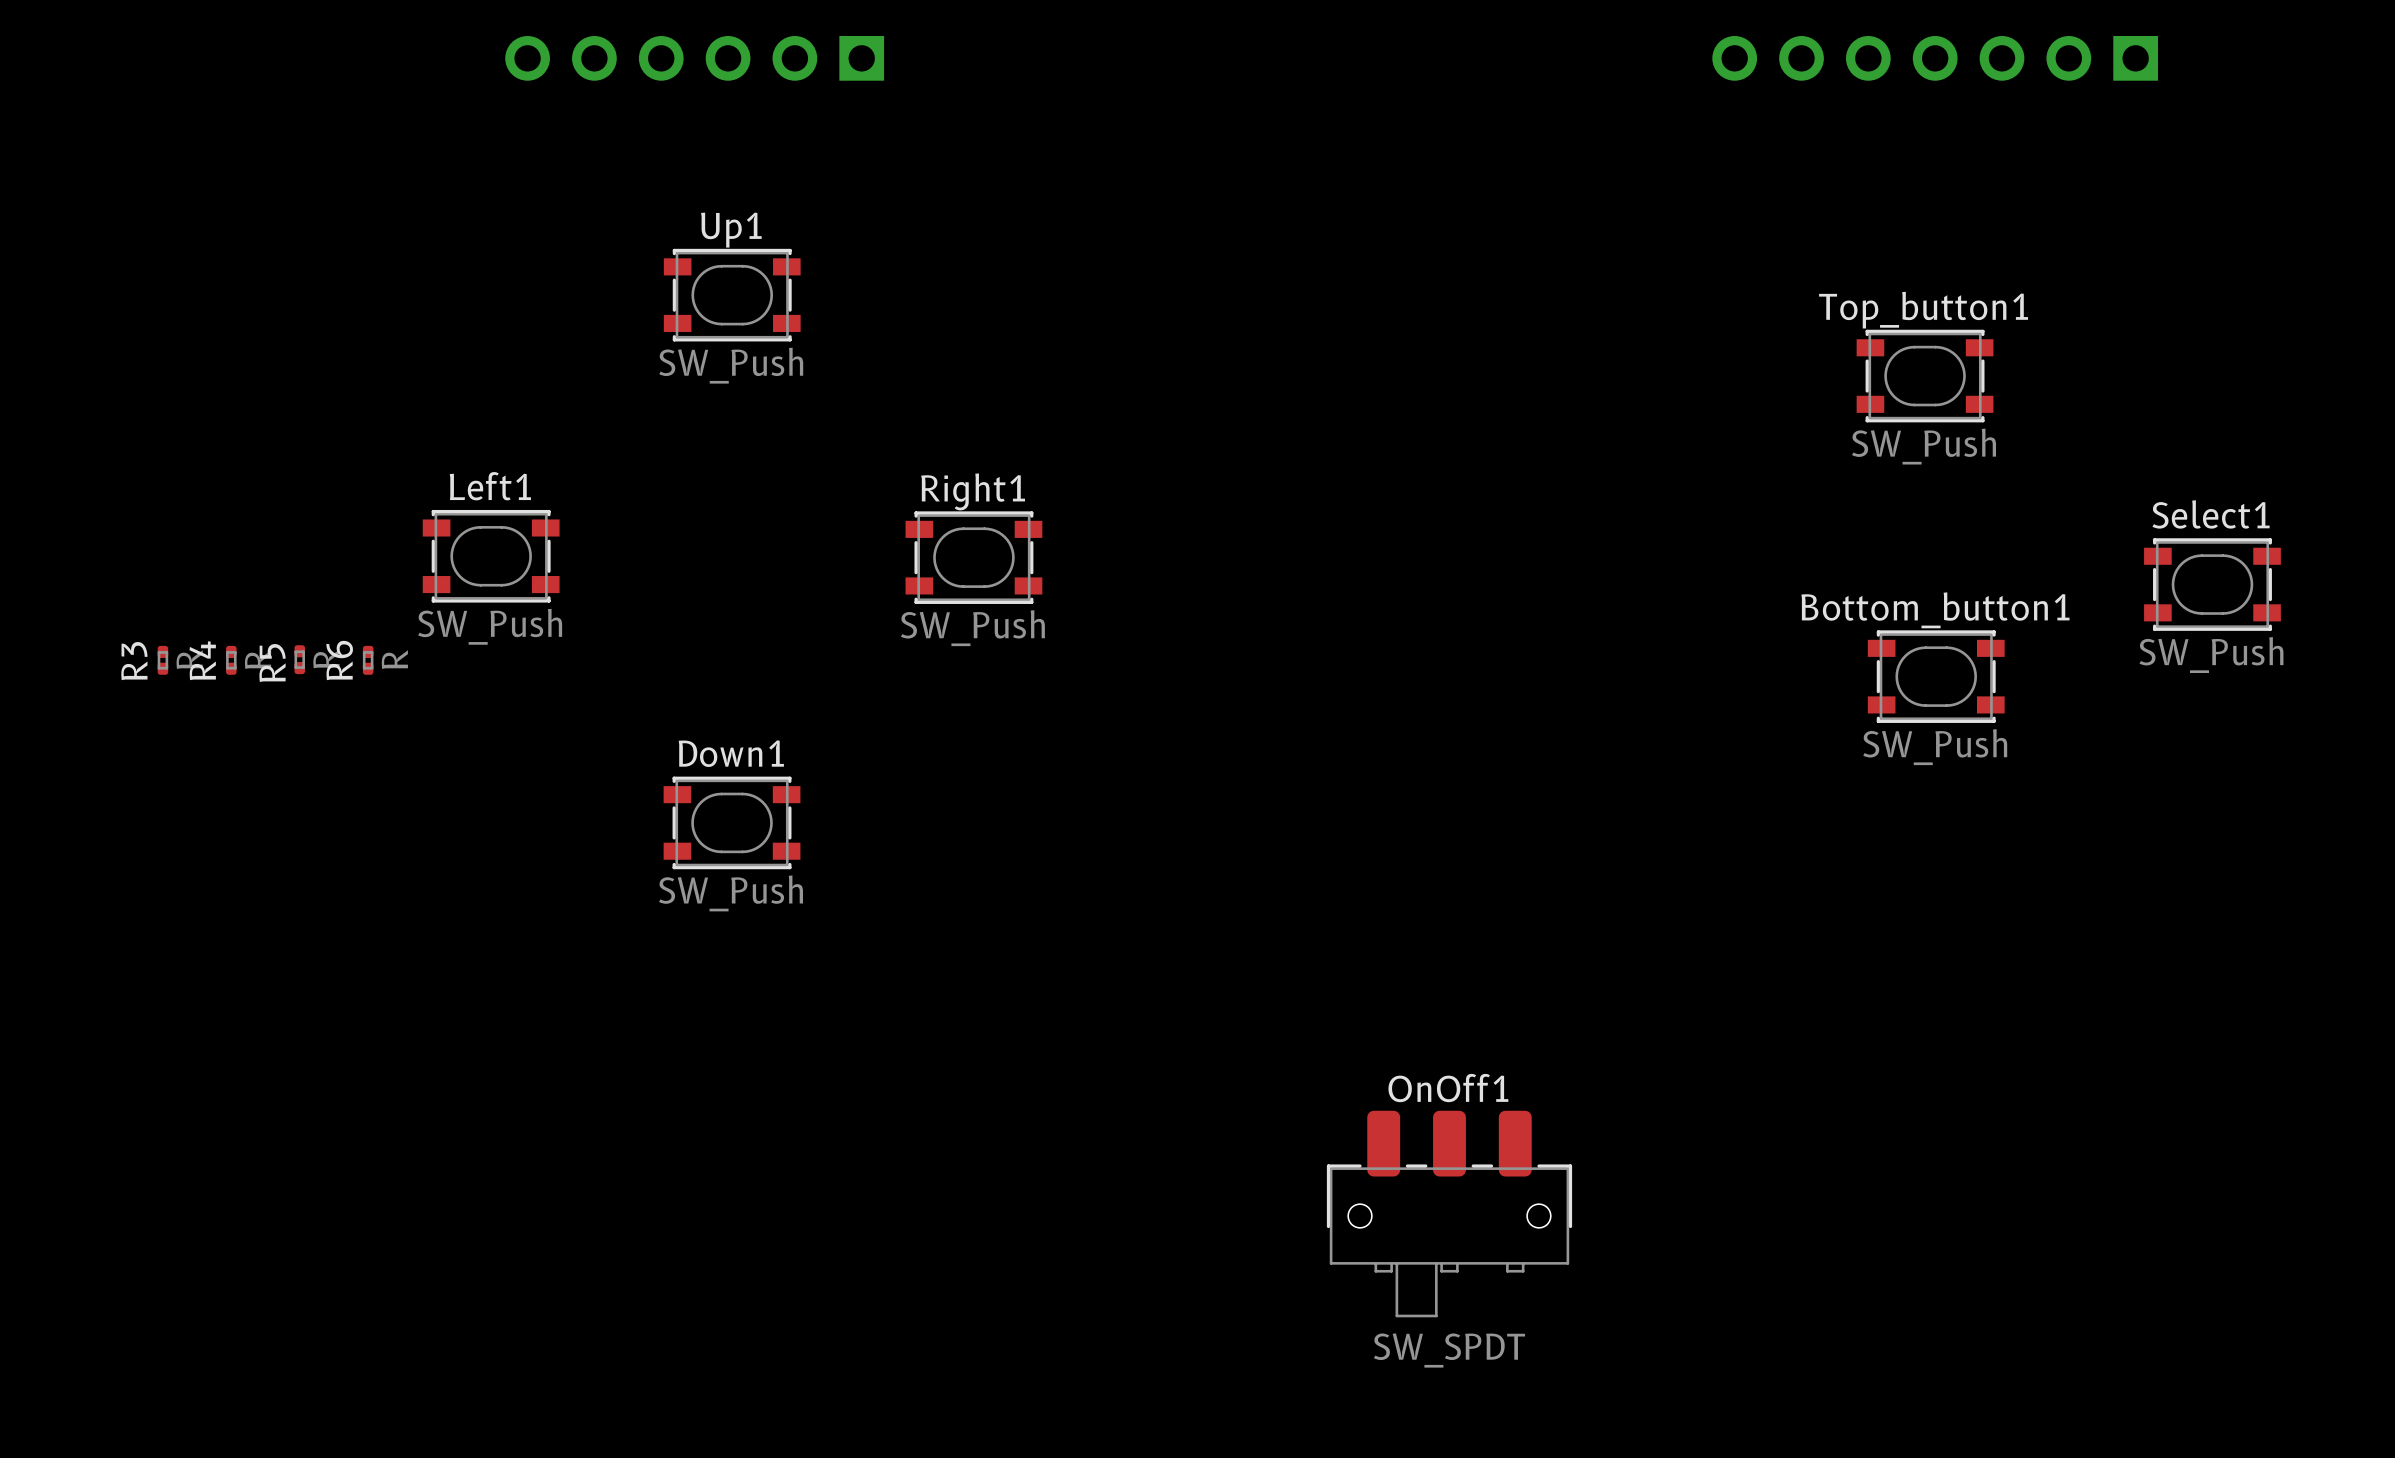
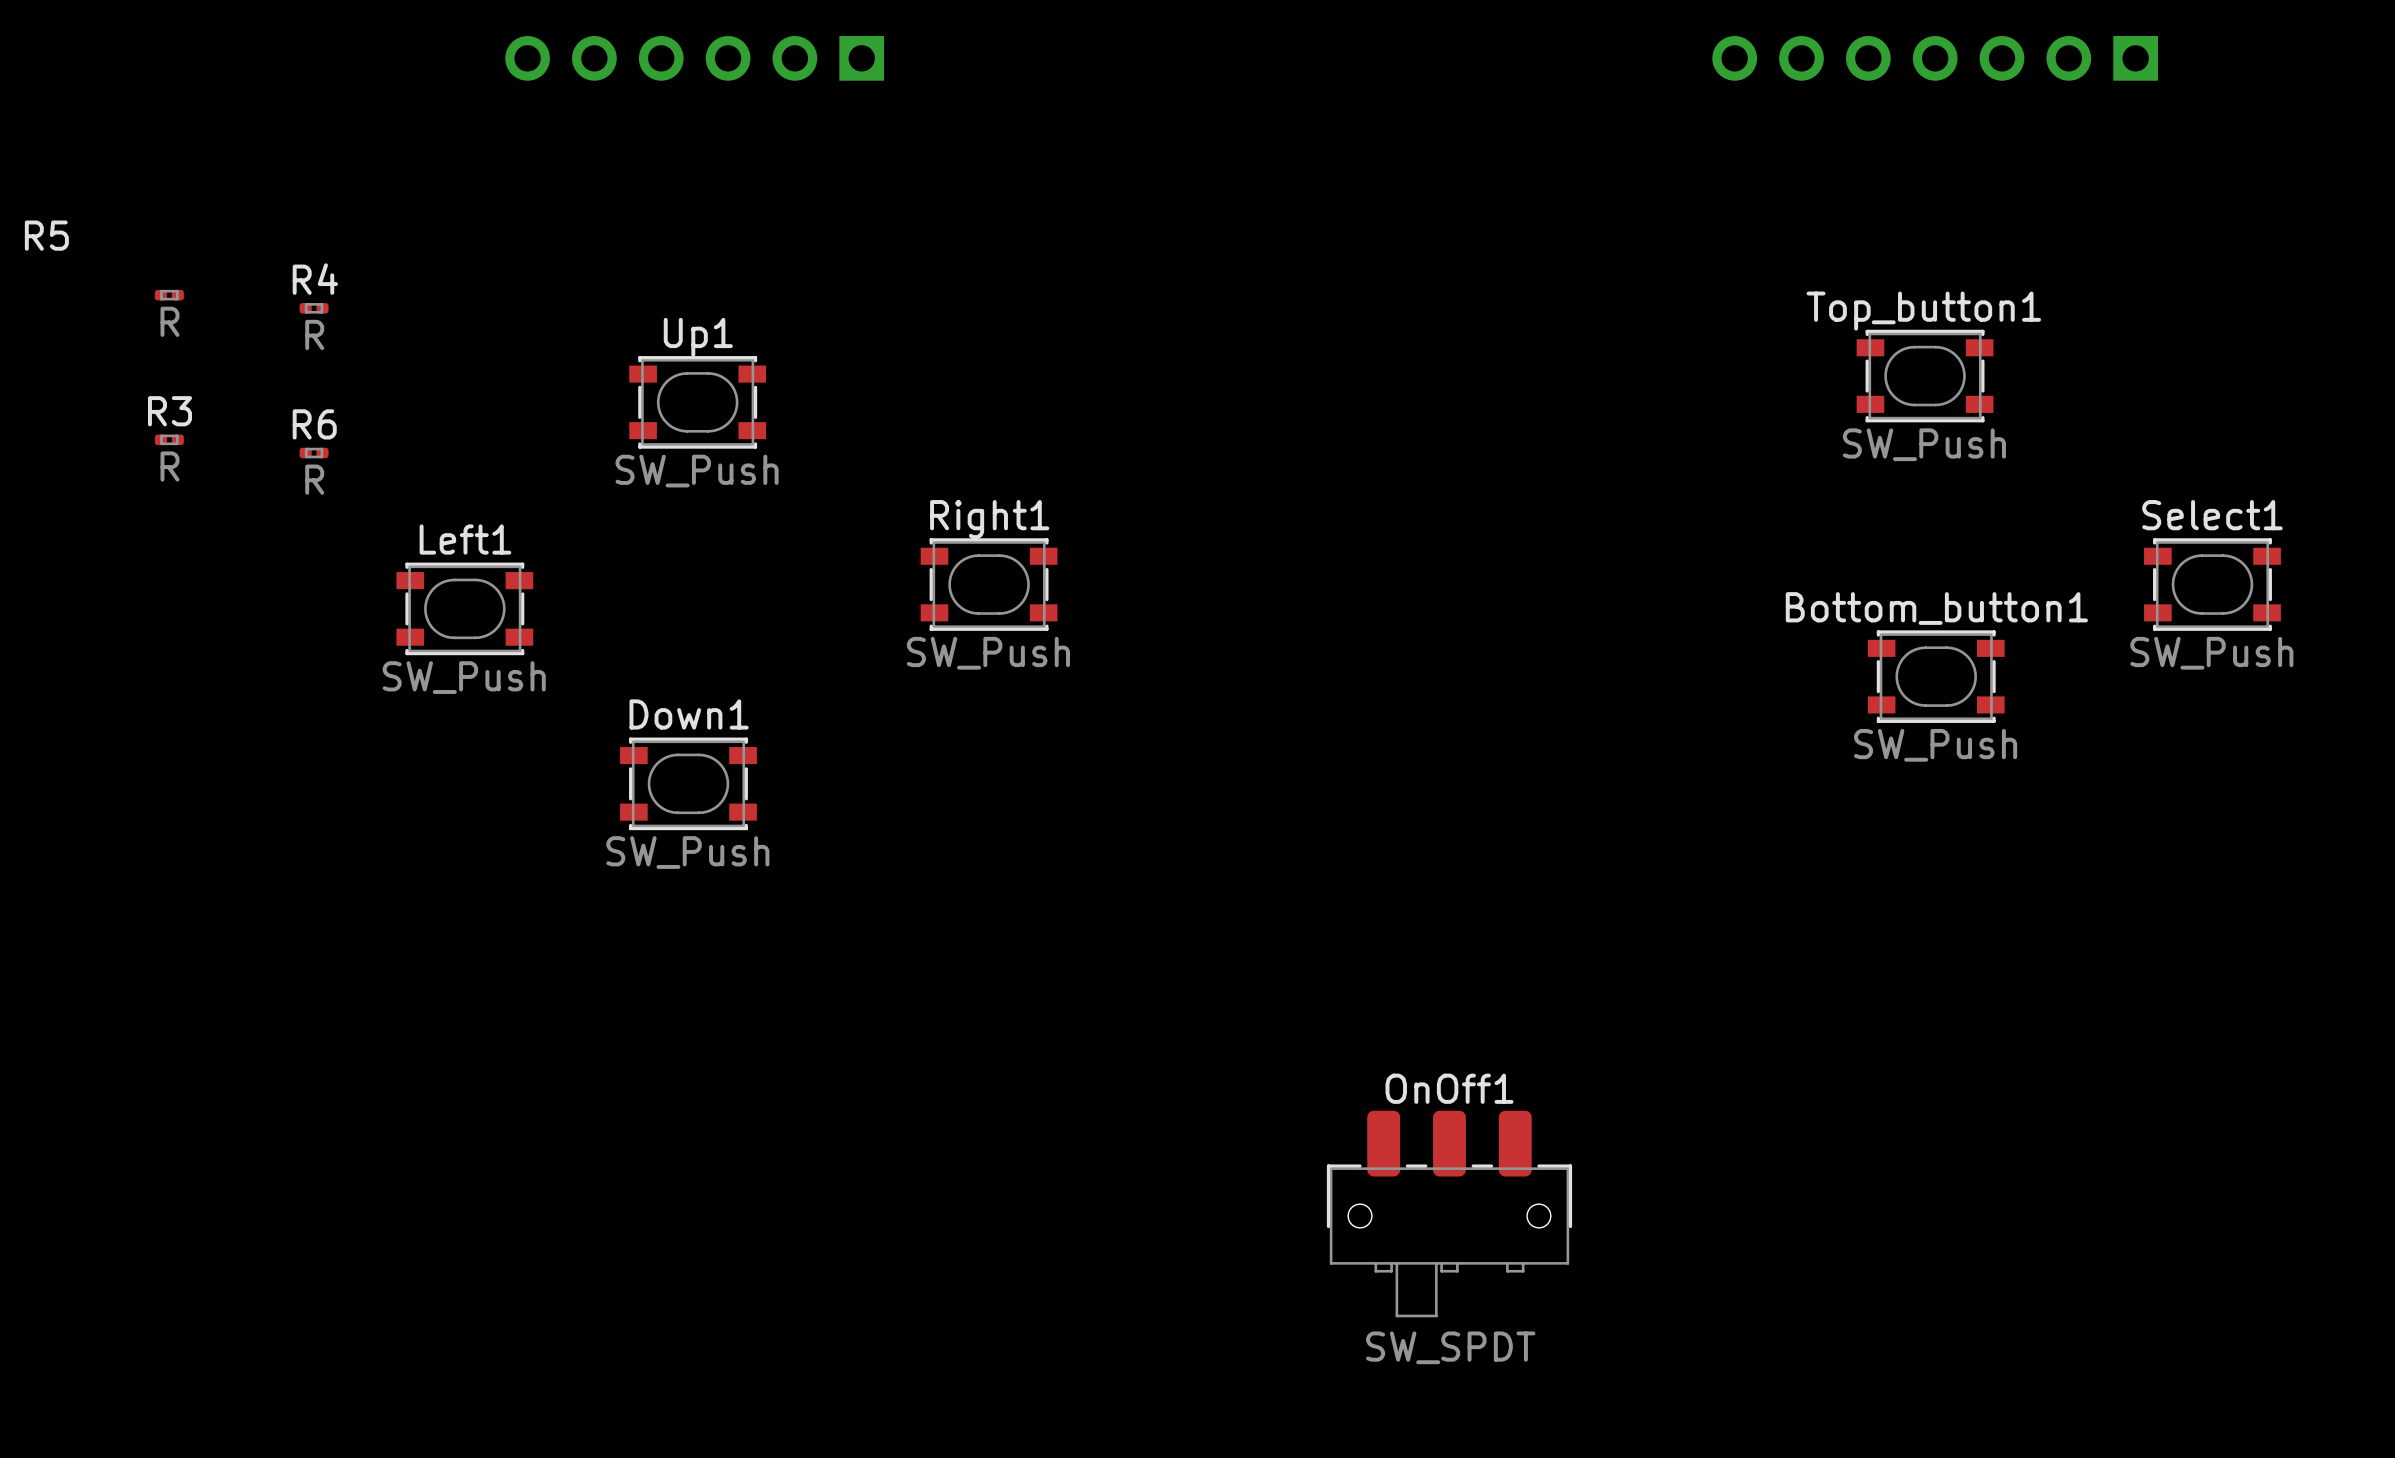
Up1 position: (732, 295) -> (697, 402)
Left1 position: (491, 556) -> (464, 608)
Right1 position: (973, 557) -> (989, 584)
R5 rotation: 0° (299, 659) -> 90° clockwise (169, 295)
R5 position: (299, 659) -> (169, 295)
R3 rotation: 0° (162, 660) -> 90° clockwise (169, 439)
R3 position: (162, 660) -> (169, 439)
R4 rotation: 0° (231, 660) -> 90° clockwise (314, 308)
R4 position: (231, 660) -> (314, 308)
R6 rotation: 0° (368, 660) -> 90° clockwise (314, 453)
R6 position: (368, 660) -> (314, 453)
R5 name position: R5 (272, 663) -> R5 (46, 235)
Down1 position: (732, 822) -> (688, 783)

